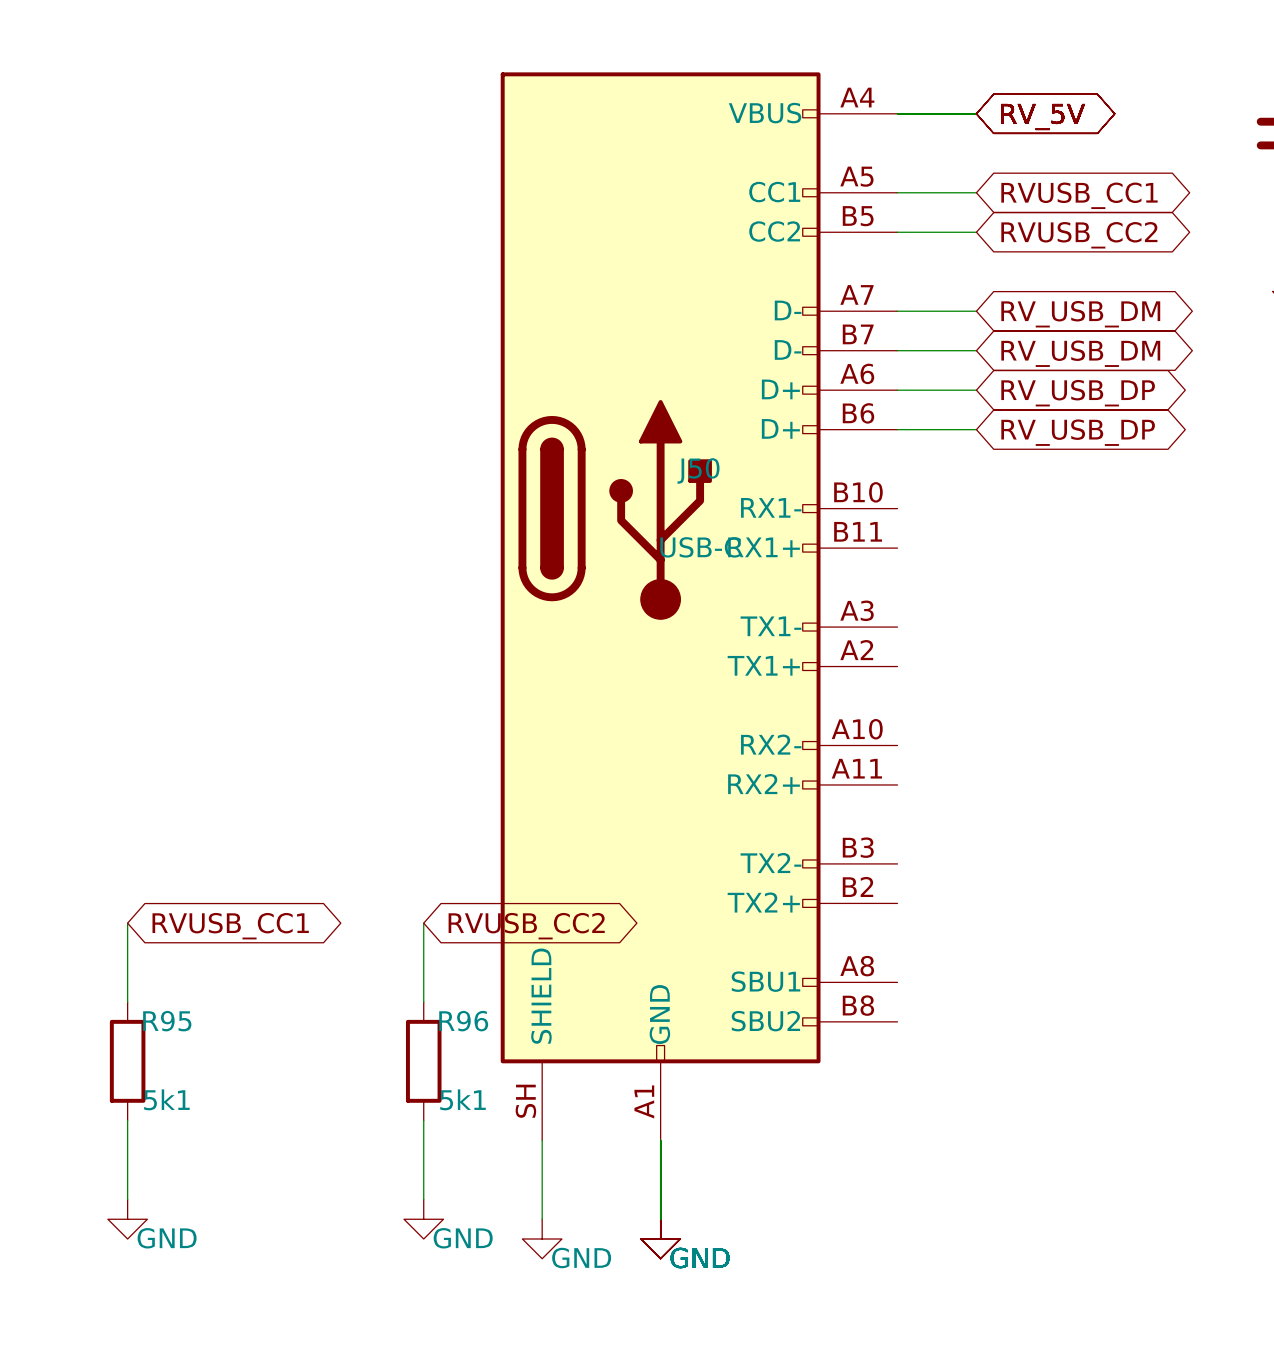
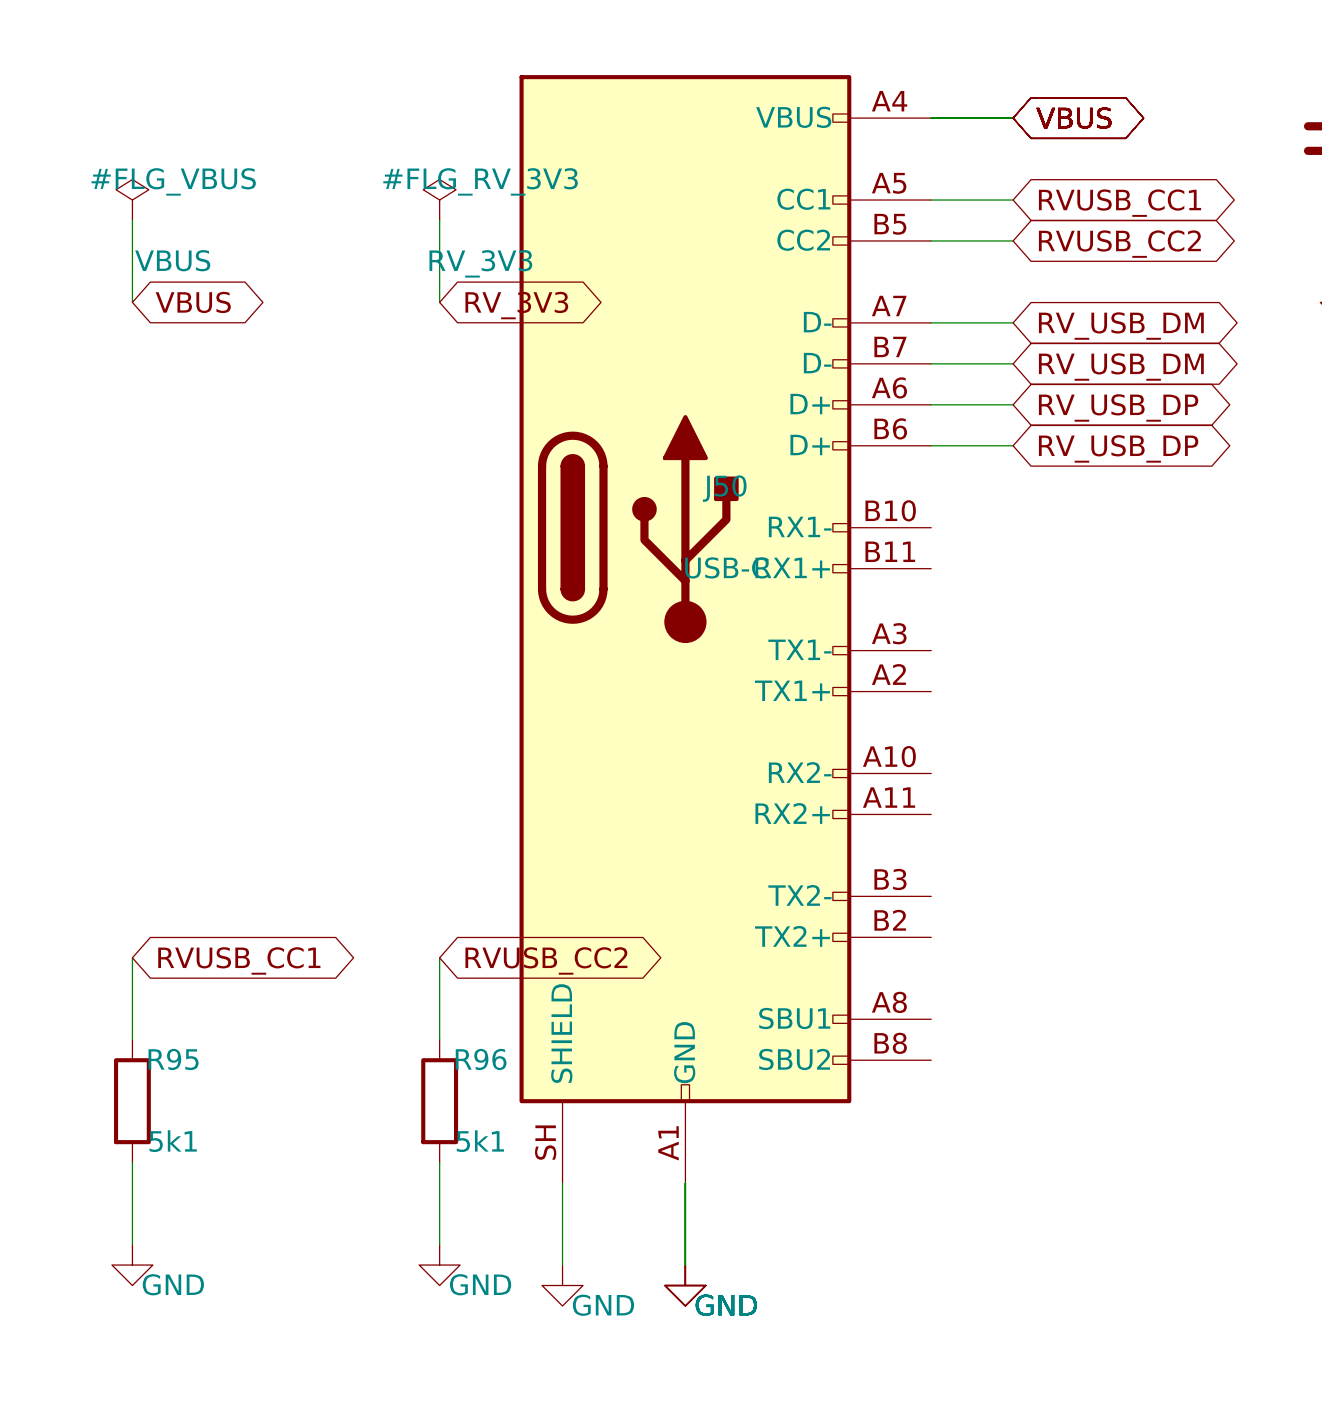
global label: RV_5V (1043, 117) -> VBUS (1073, 118)
#FLG_VBUS: none -> VBUS (132, 200)
#FLG_RV_3V3: none -> RV_3V3 (439, 200)
wire: none -> (132, 220) (132, 302)
wire: none -> (439, 220) (439, 302)
global label: none -> VBUS (193, 302)
global label: none -> RV_3V3 (516, 305)

